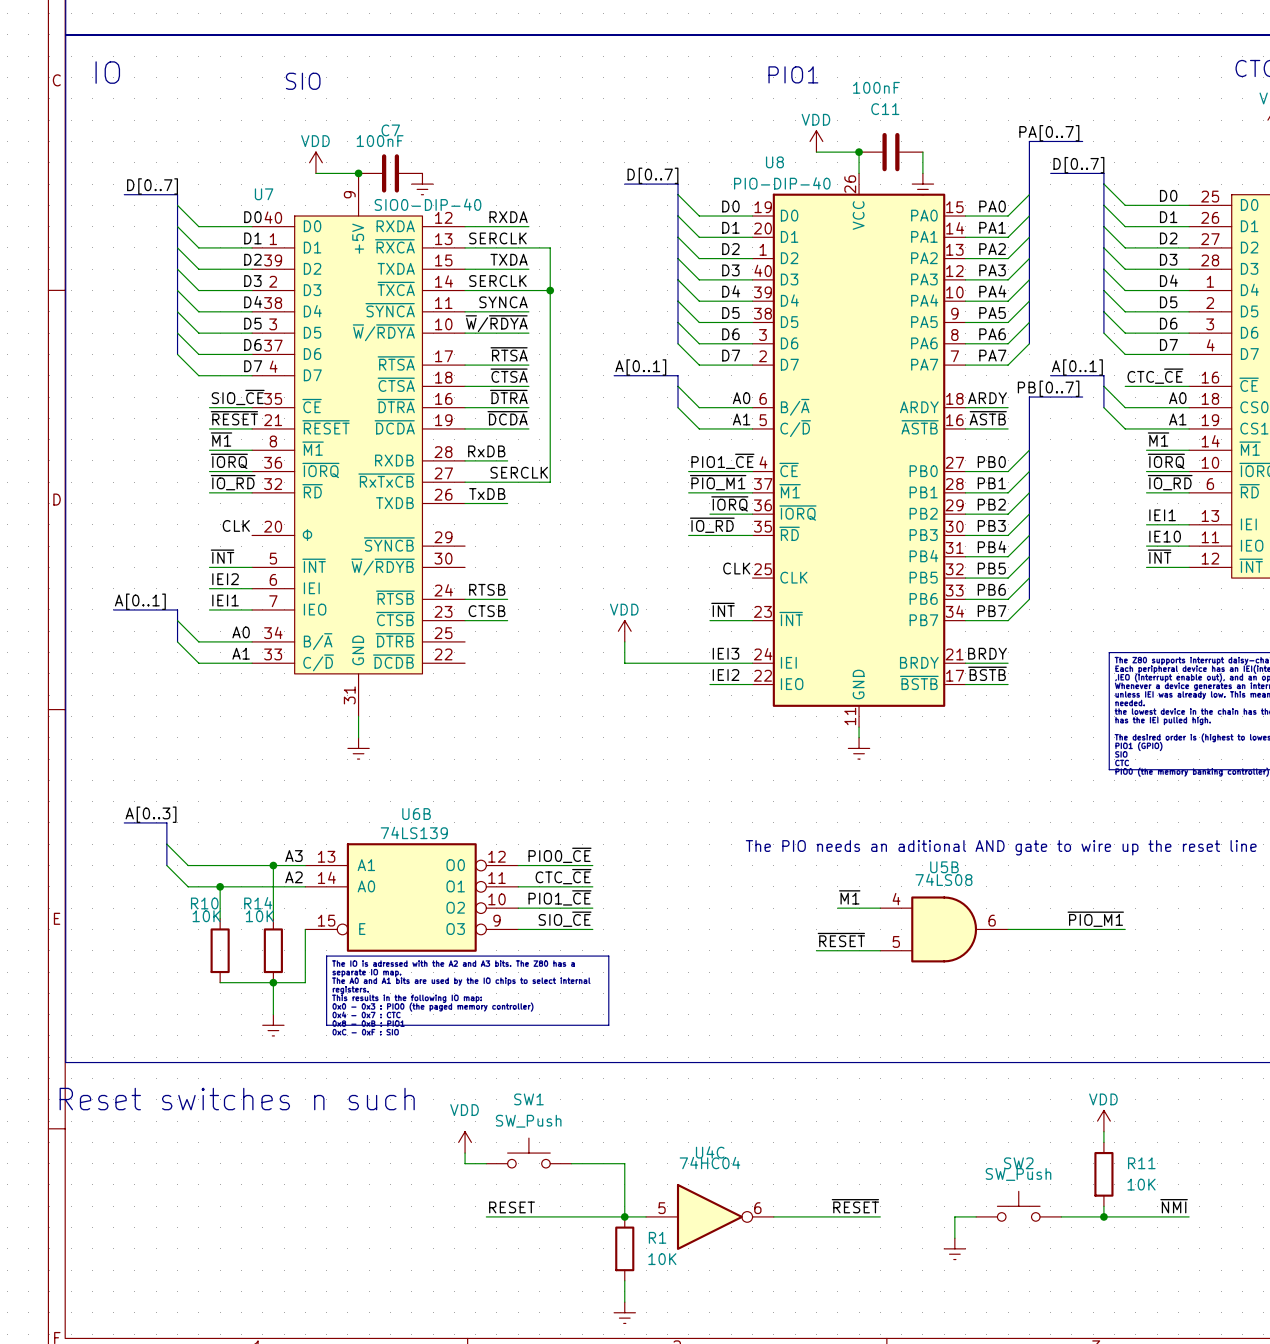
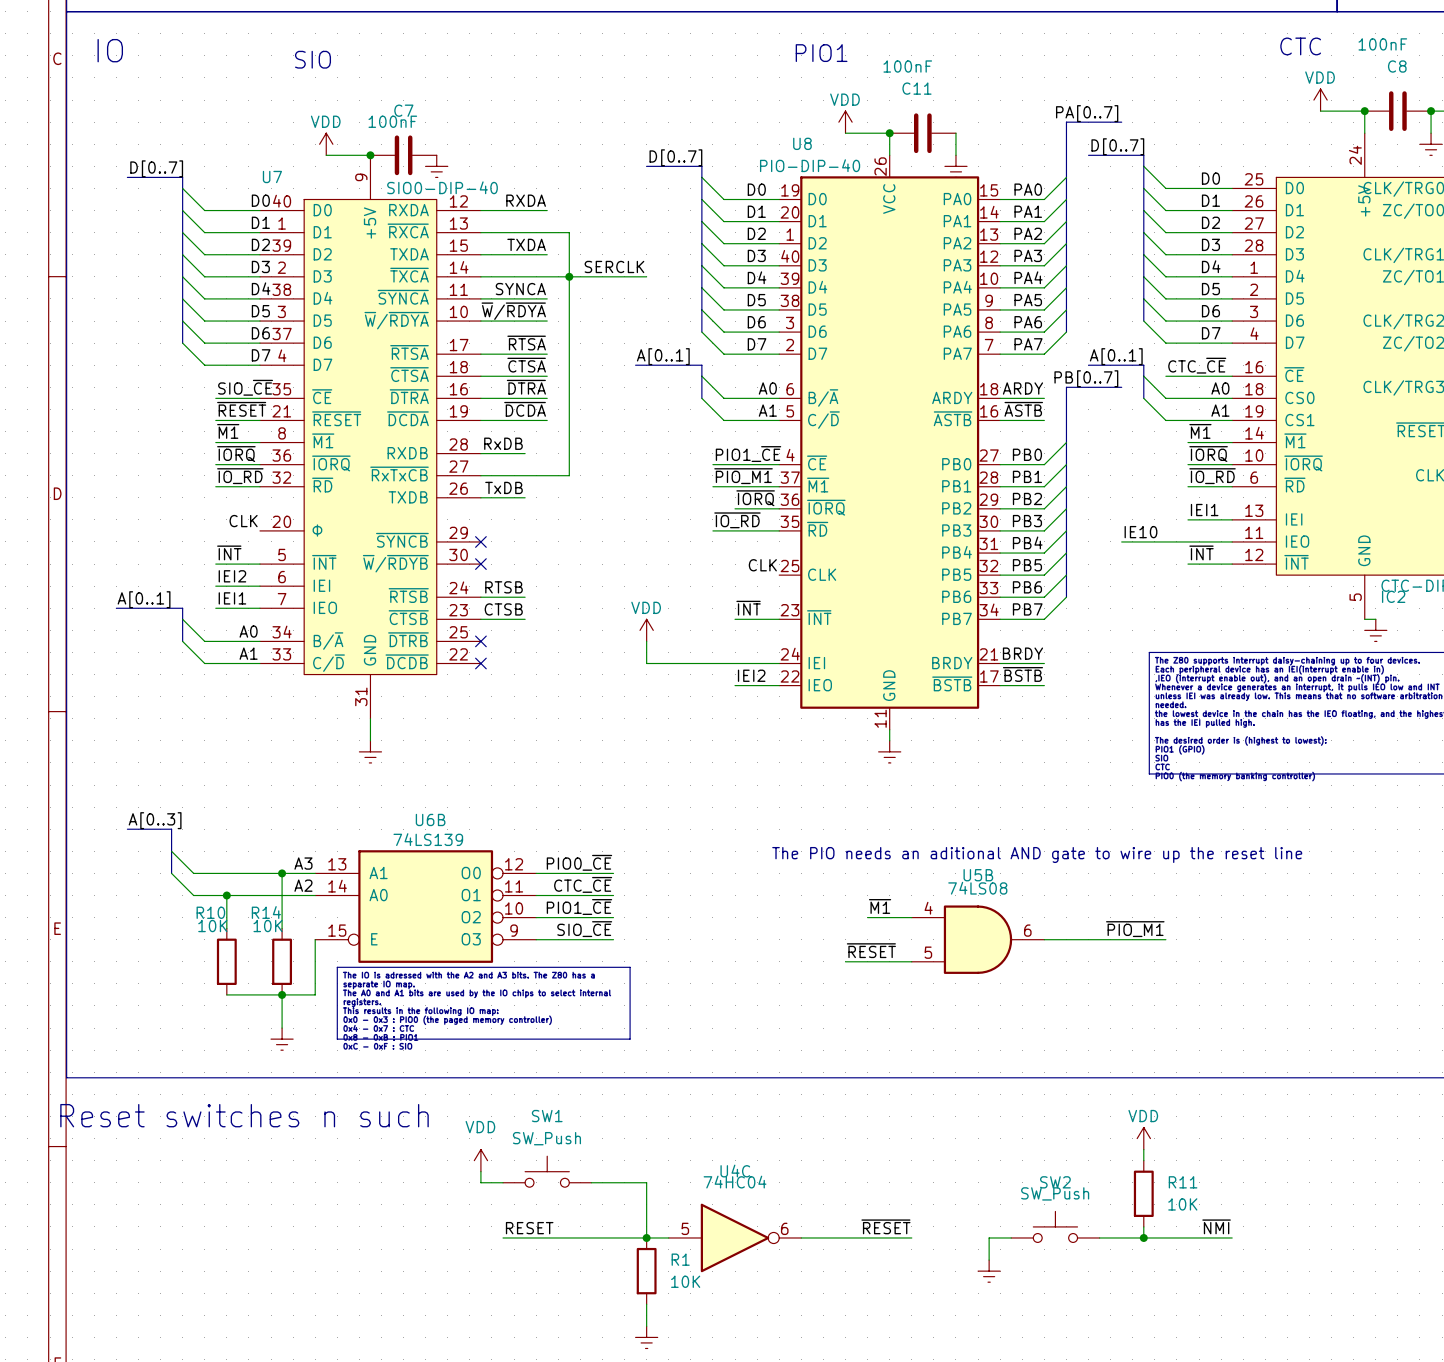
label: SERCLK (497, 238) -> none
label: SERCLK (497, 281) -> none
label: none -> SERCLK (614, 266)
wire: none -> (569, 276) (646, 276)
label: SERCLK (519, 472) -> none
label position: IE10 (1165, 536) -> IE10 (1140, 532)
no-connect mark: none -> (480, 541)
wire: none -> (1121, 541) (1187, 541)
no-connect mark: none -> (480, 564)
no-connect mark: none -> (480, 641)
label: IEI3 (726, 653) -> none
no-connect mark: none -> (480, 663)

